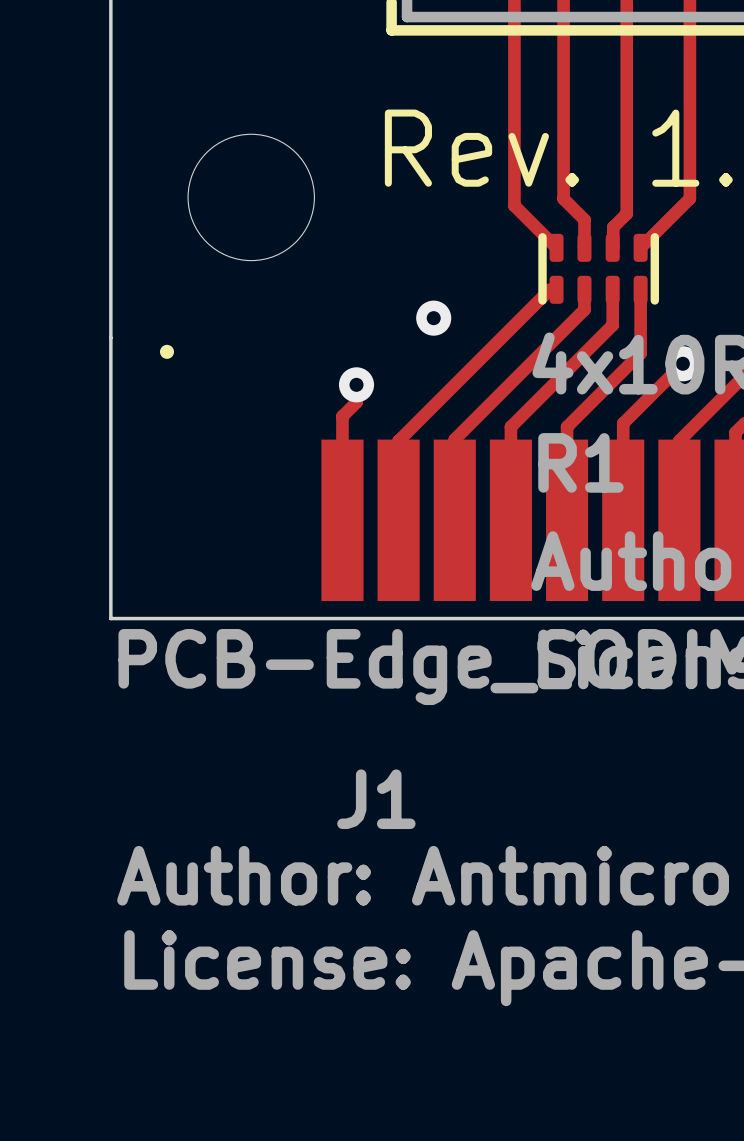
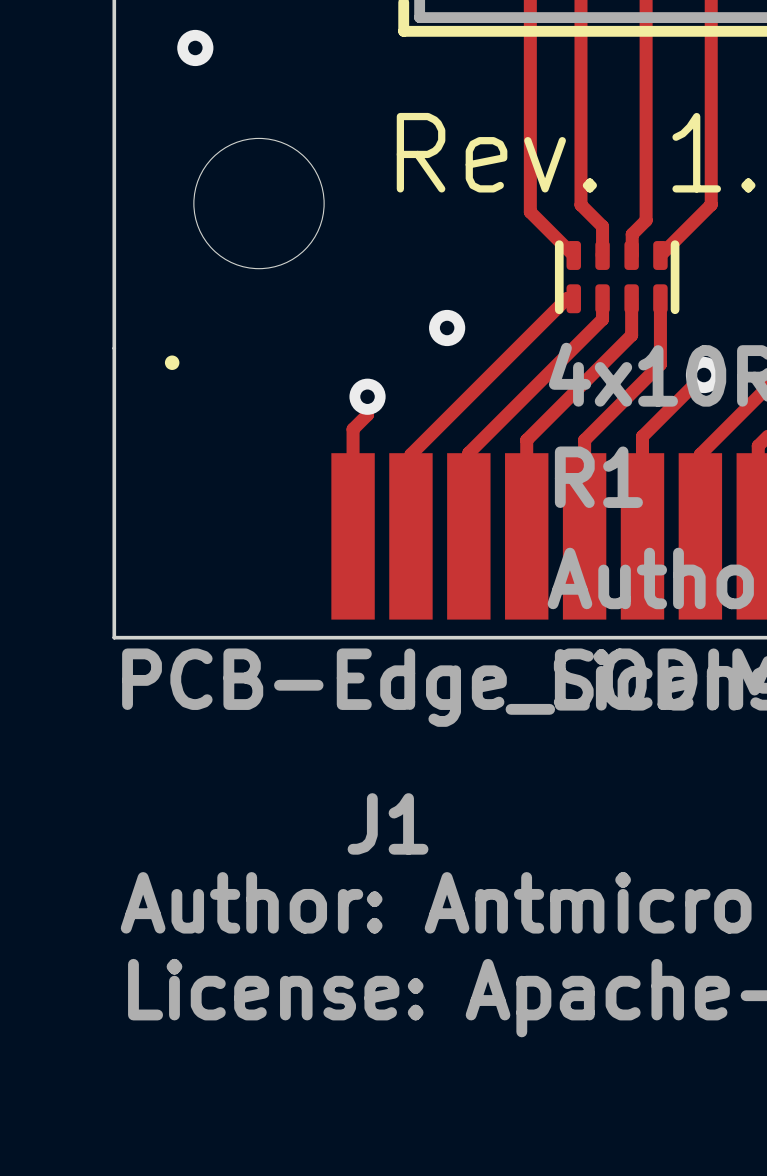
via: none -> (195, 47)

